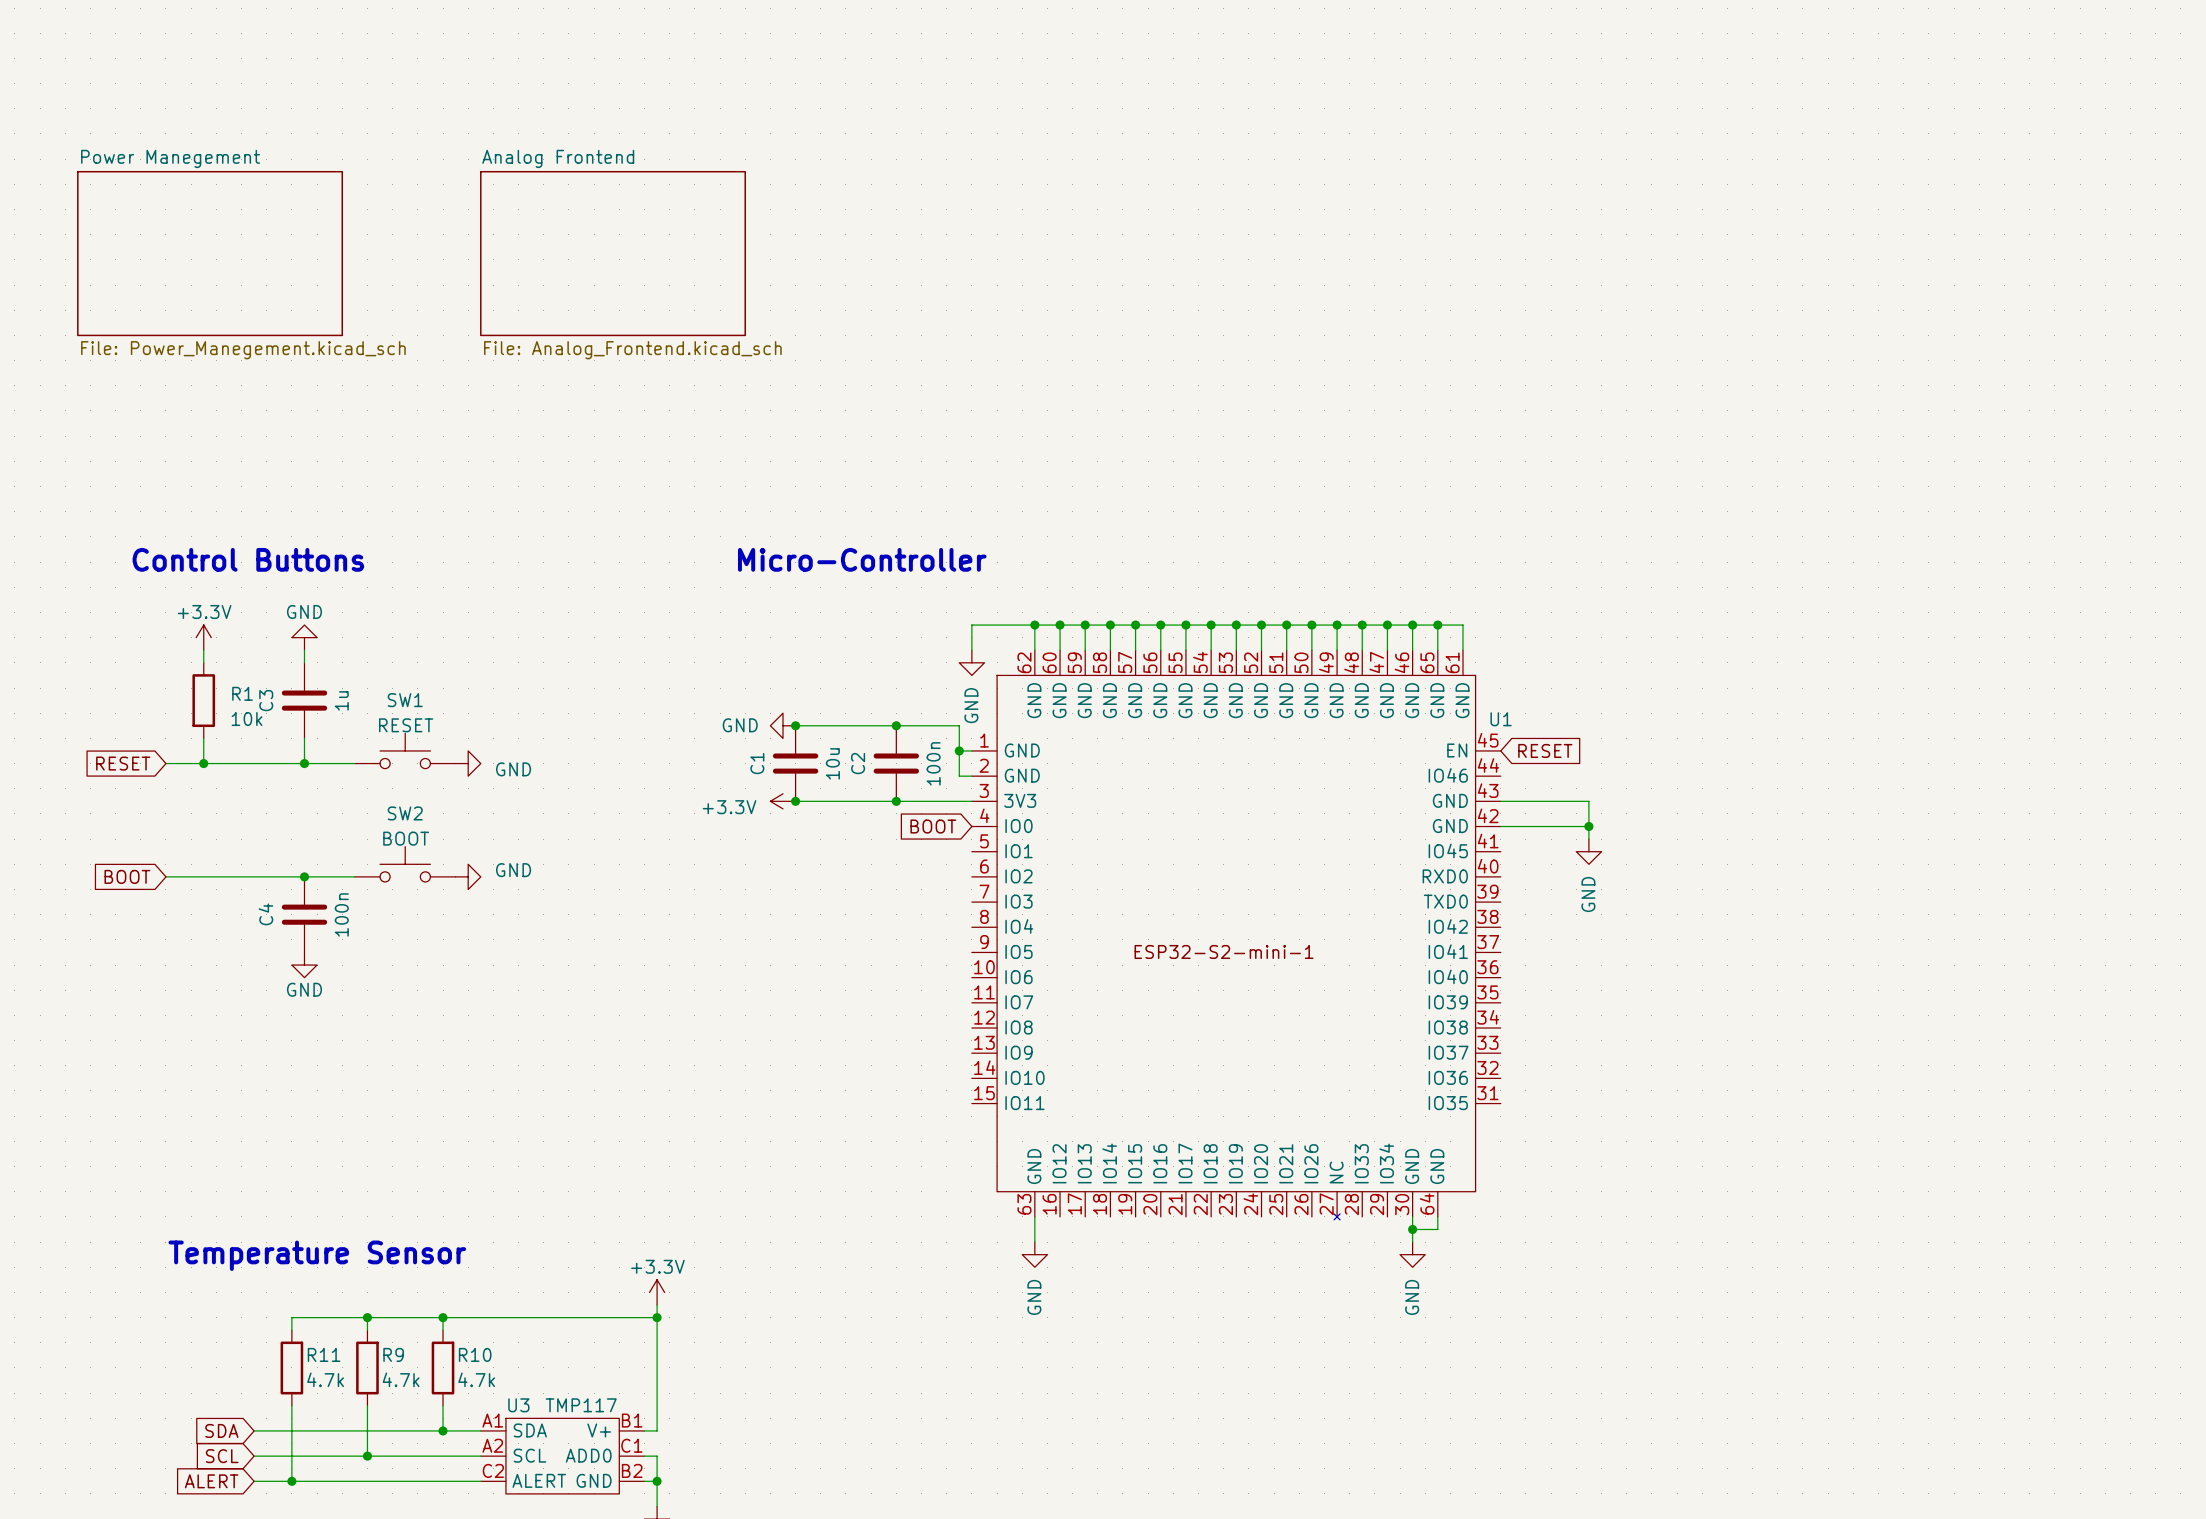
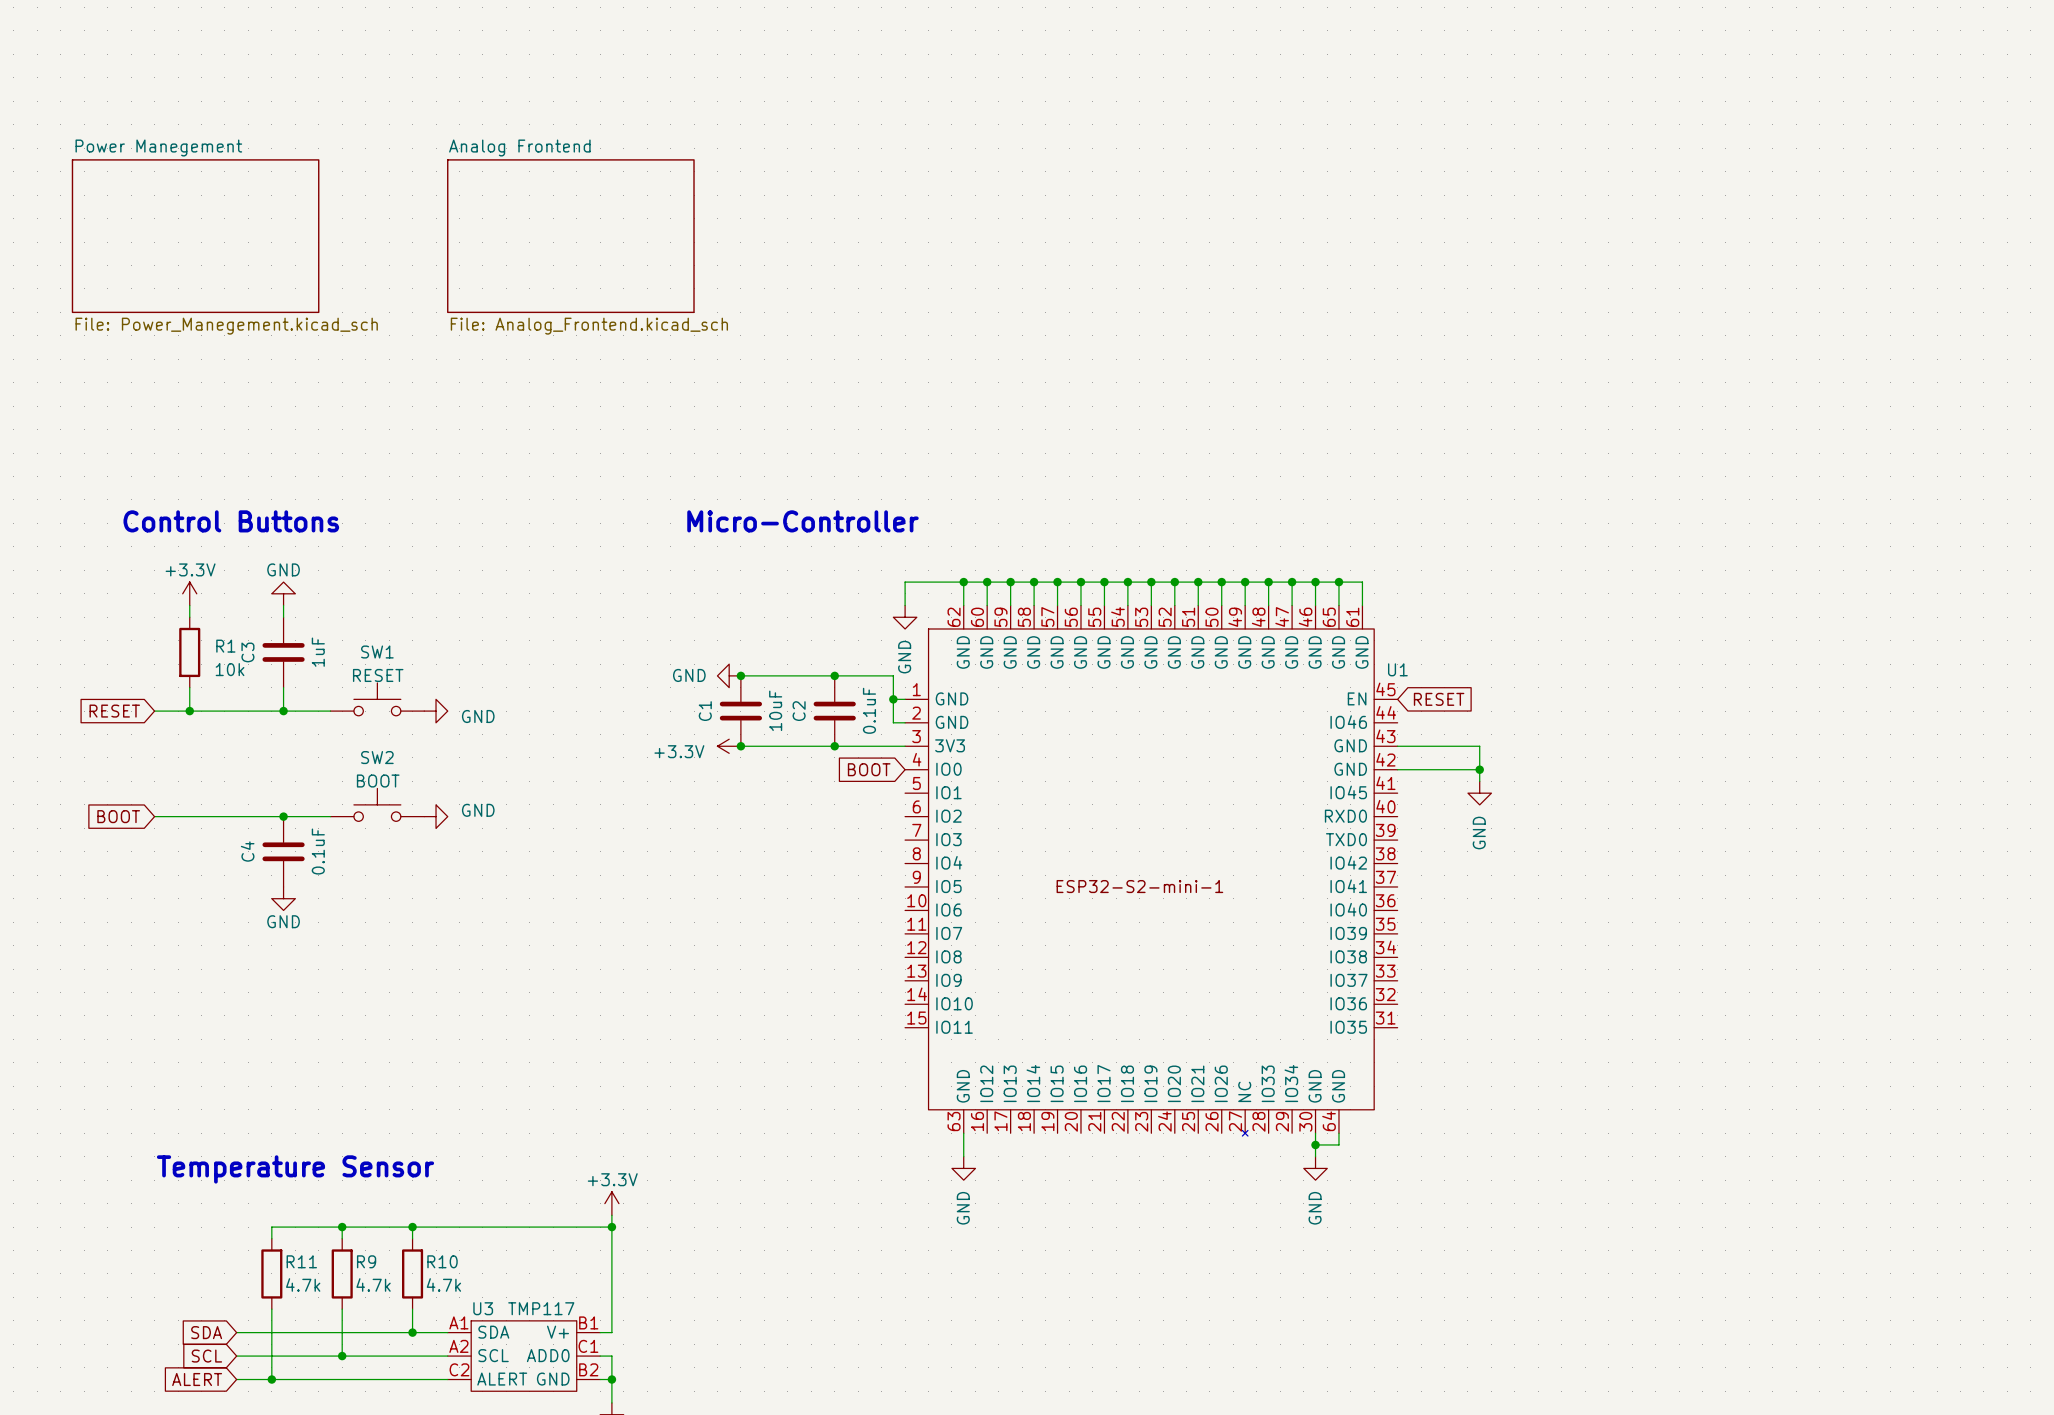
C3 value: 1u (341, 700) -> 1uF (318, 652)
C1 value: 10u (832, 763) -> 10uF (775, 710)
C2 value: 100n (933, 763) -> 0.1uF (869, 710)
C4 value: 100n (341, 914) -> 0.1uF (318, 851)

